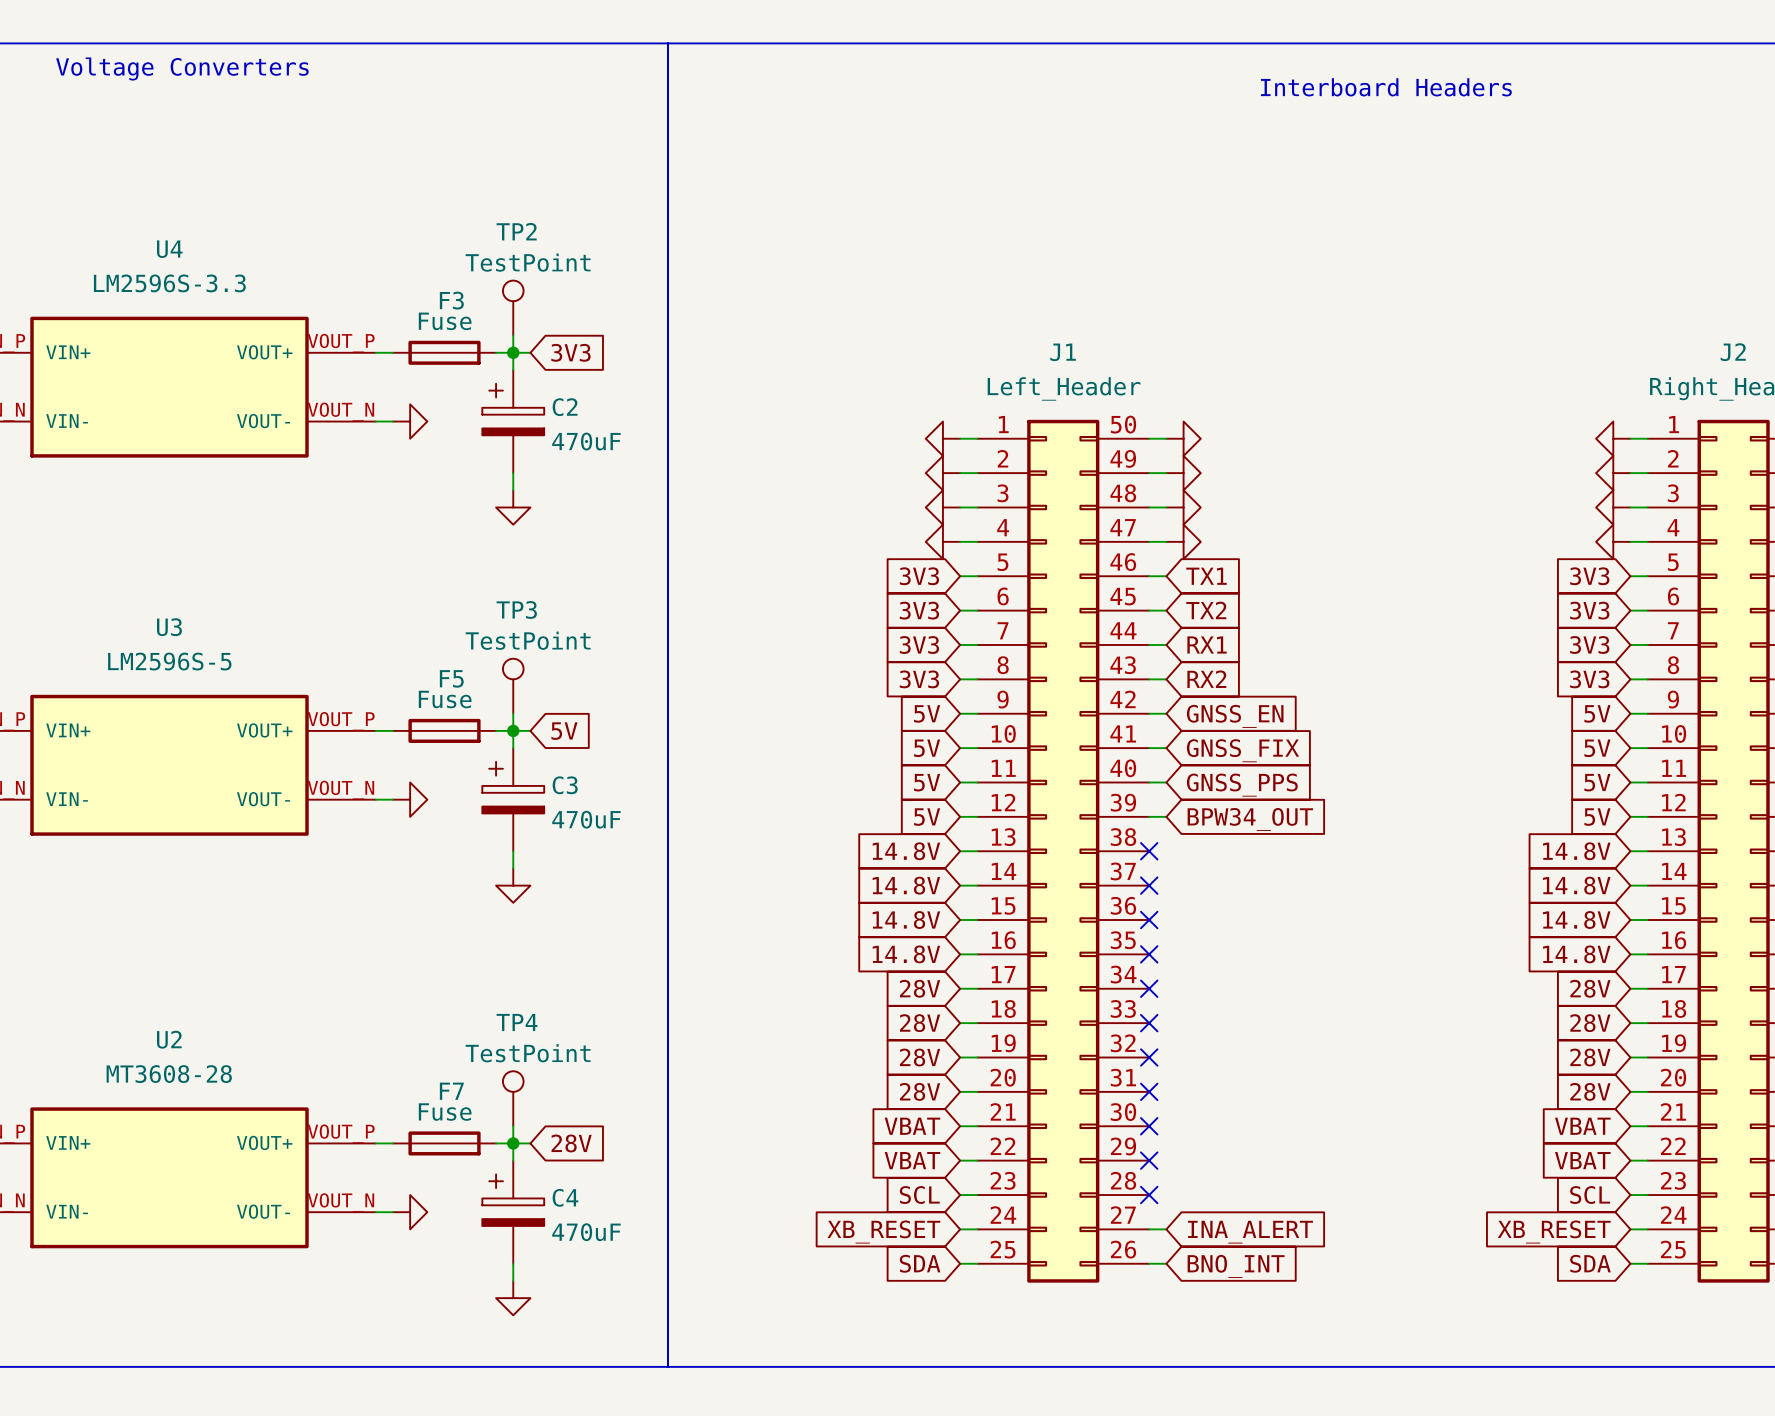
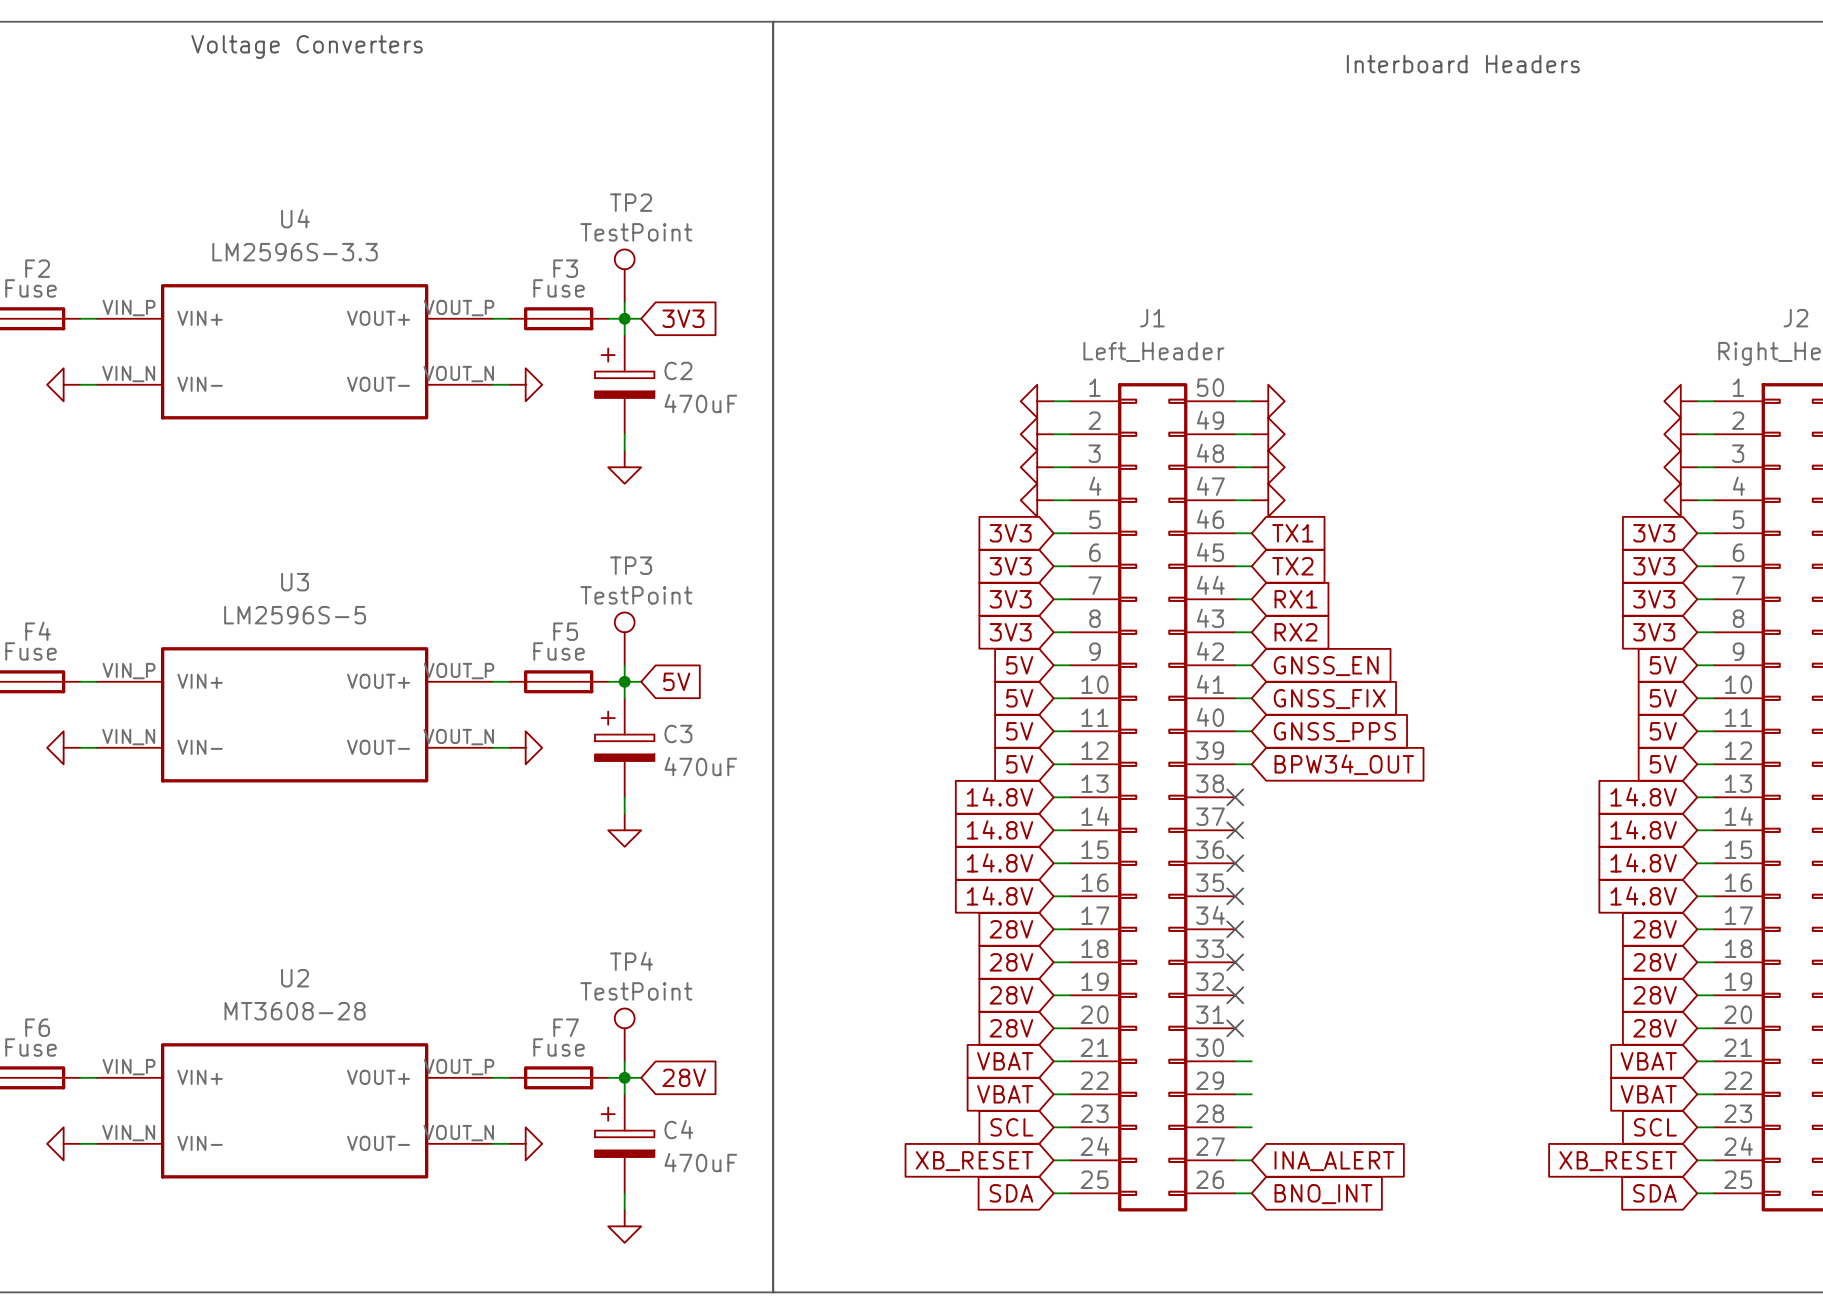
wire: none -> (1235, 1061) (1251, 1061)
no-connect mark: (1149, 1126) -> none
wire: none -> (1235, 1094) (1251, 1094)
no-connect mark: (1149, 1160) -> none
wire: none -> (1235, 1127) (1251, 1127)
no-connect mark: (1149, 1195) -> none

